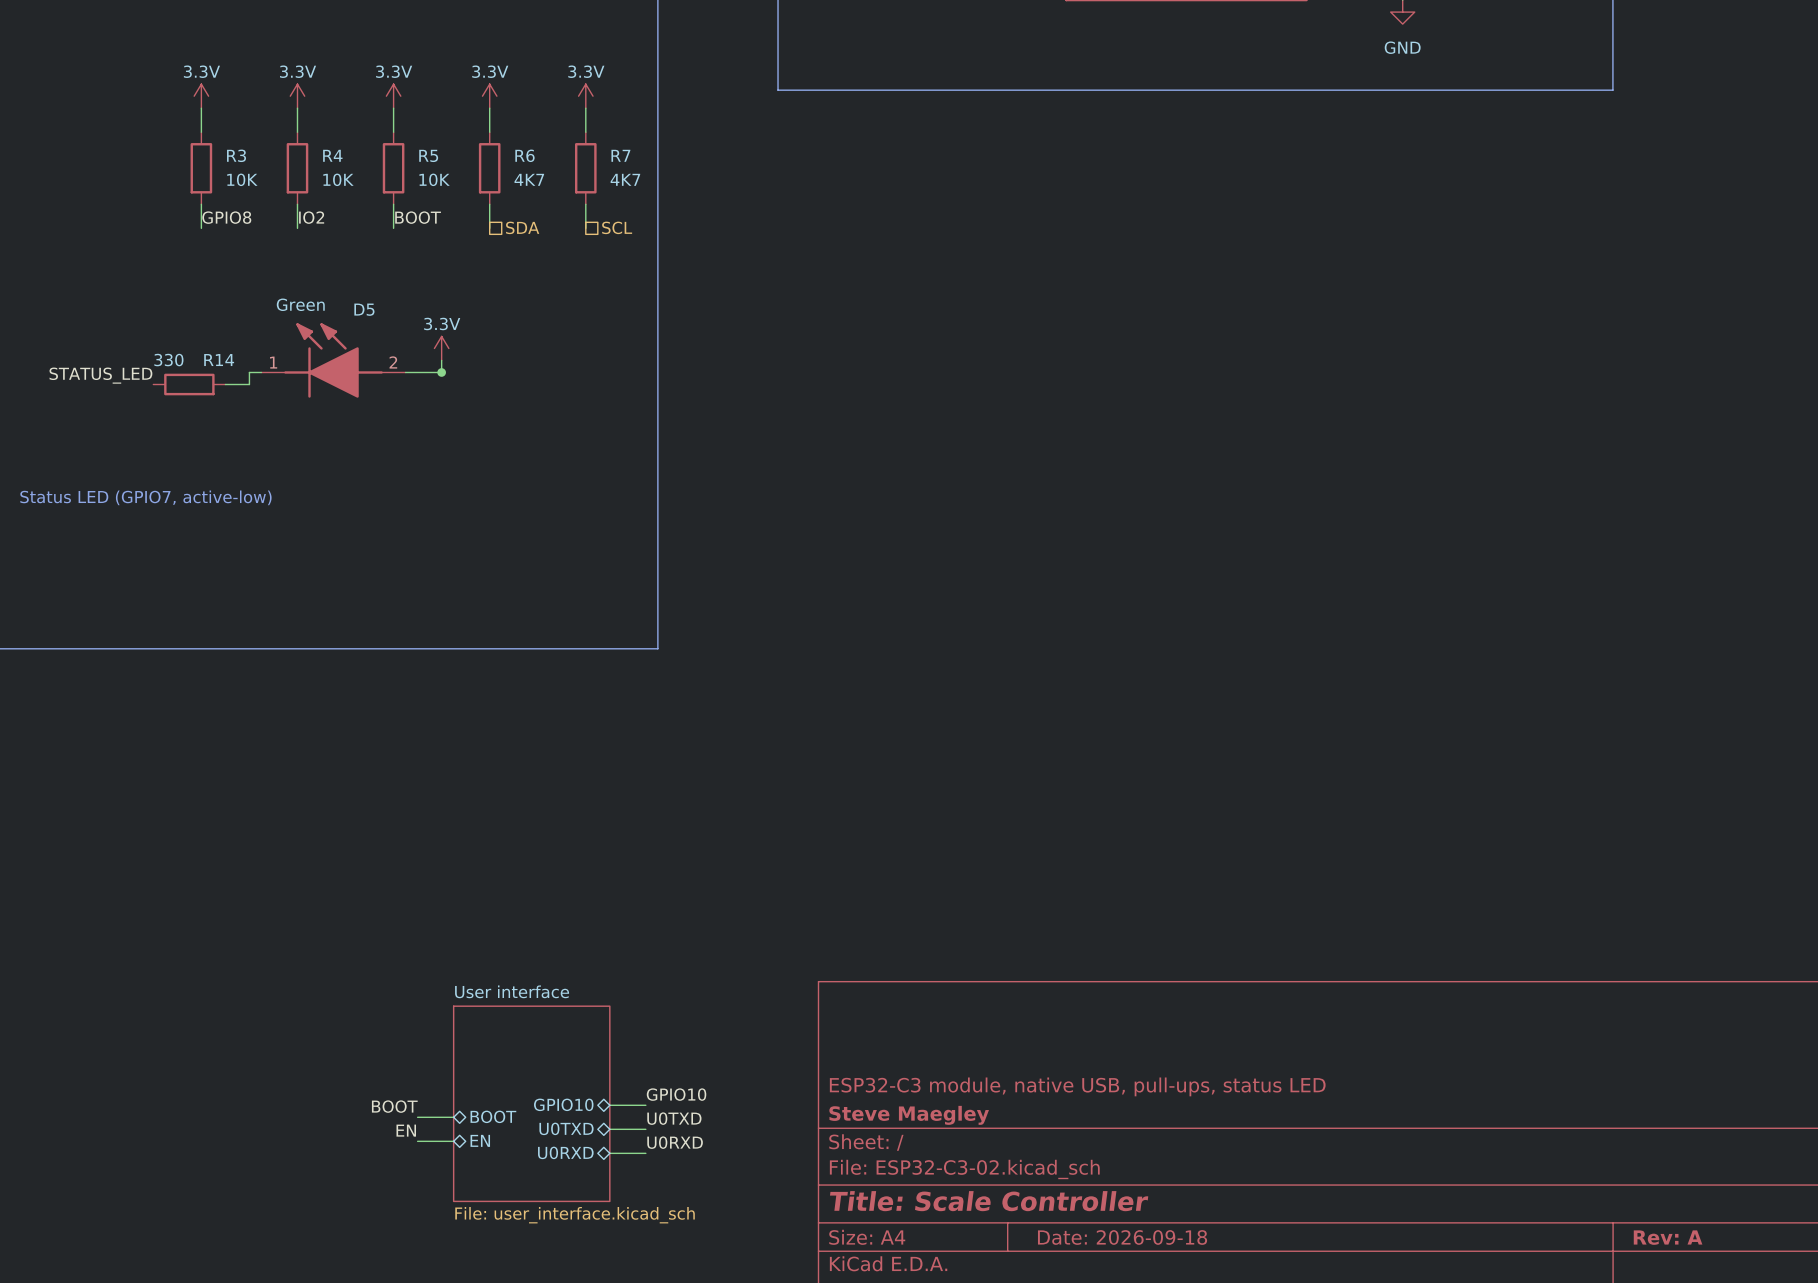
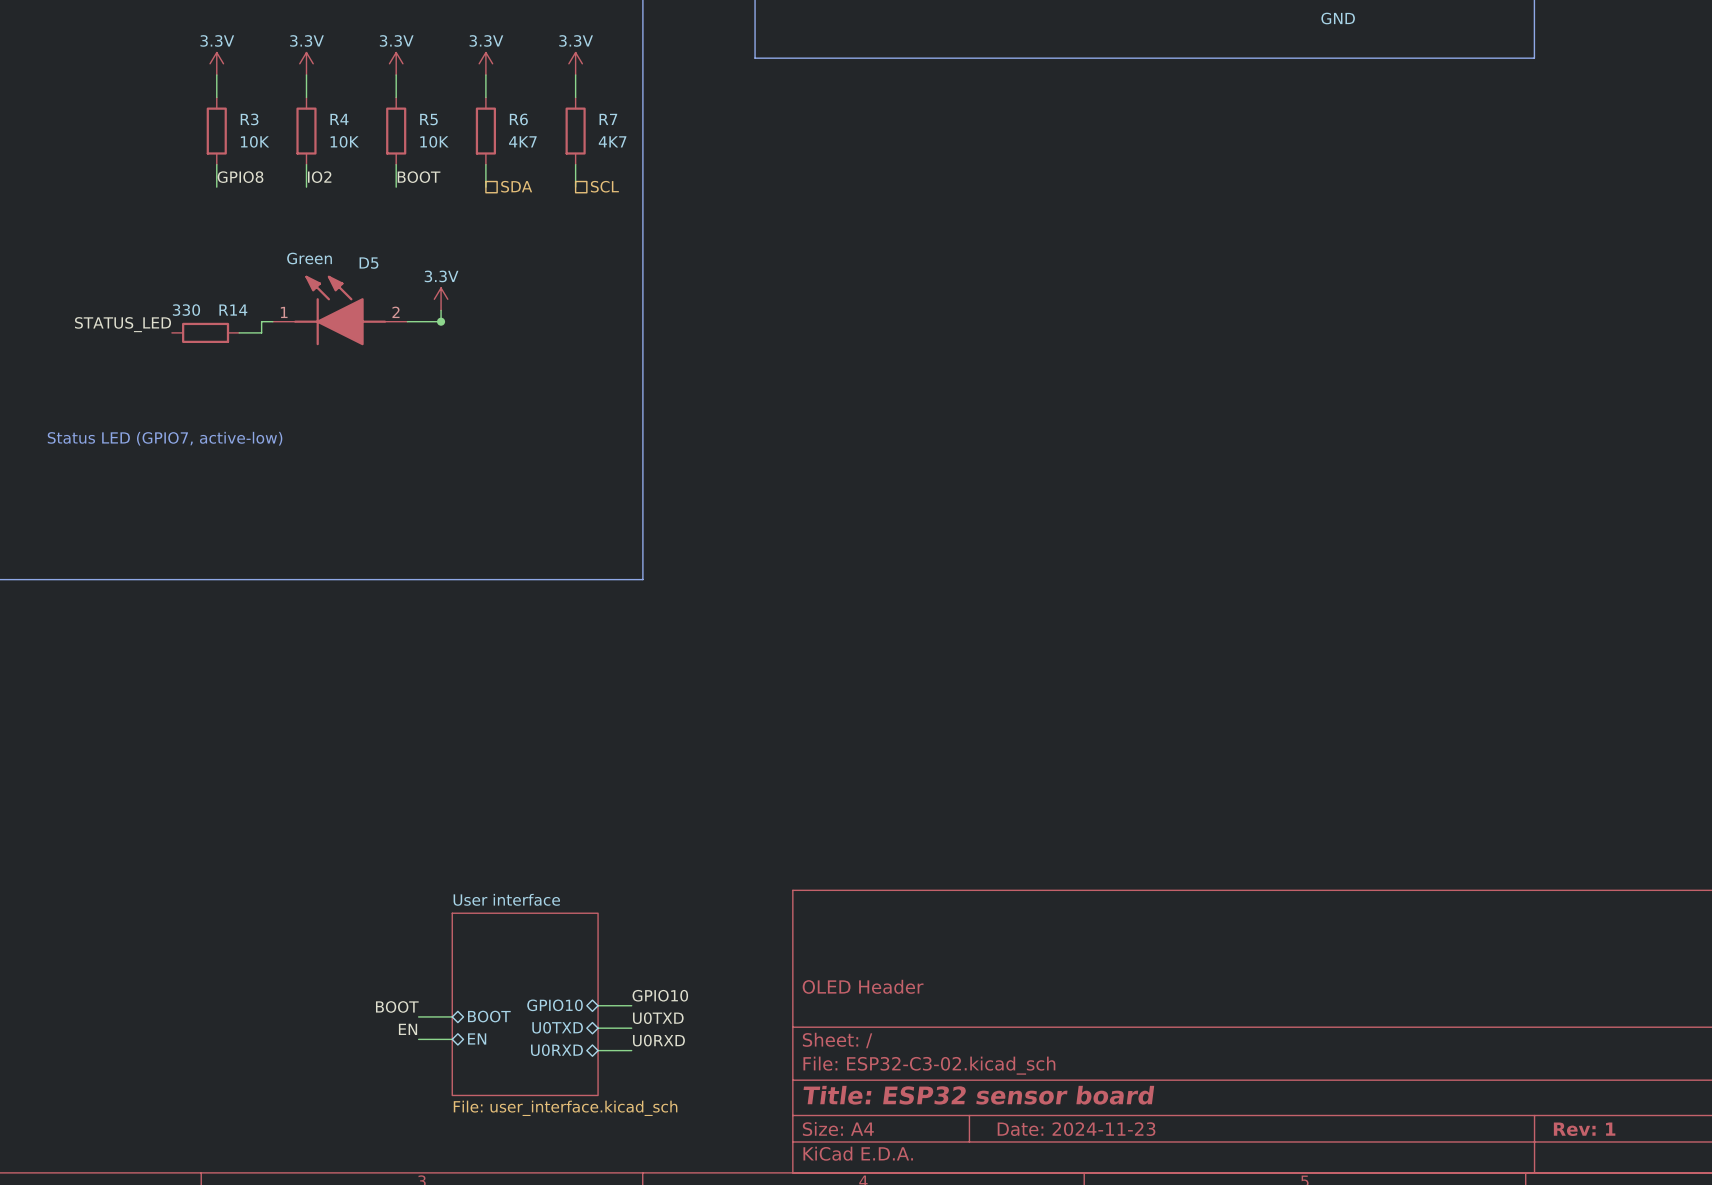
title block: ESP32-C3 module, native USB, pull-ups, status LED (1077, 1086) -> OLED Header (863, 986)
title block: Steve Maegley (909, 1115) -> none
title block: Title: Scale Controller (989, 1201) -> Title: ESP32 sensor board (978, 1095)
title block: Date: 2026-09-18 (1122, 1237) -> Date: 2024-11-23 (1076, 1129)
title block: Rev: A (1668, 1237) -> Rev: 1 (1584, 1129)

